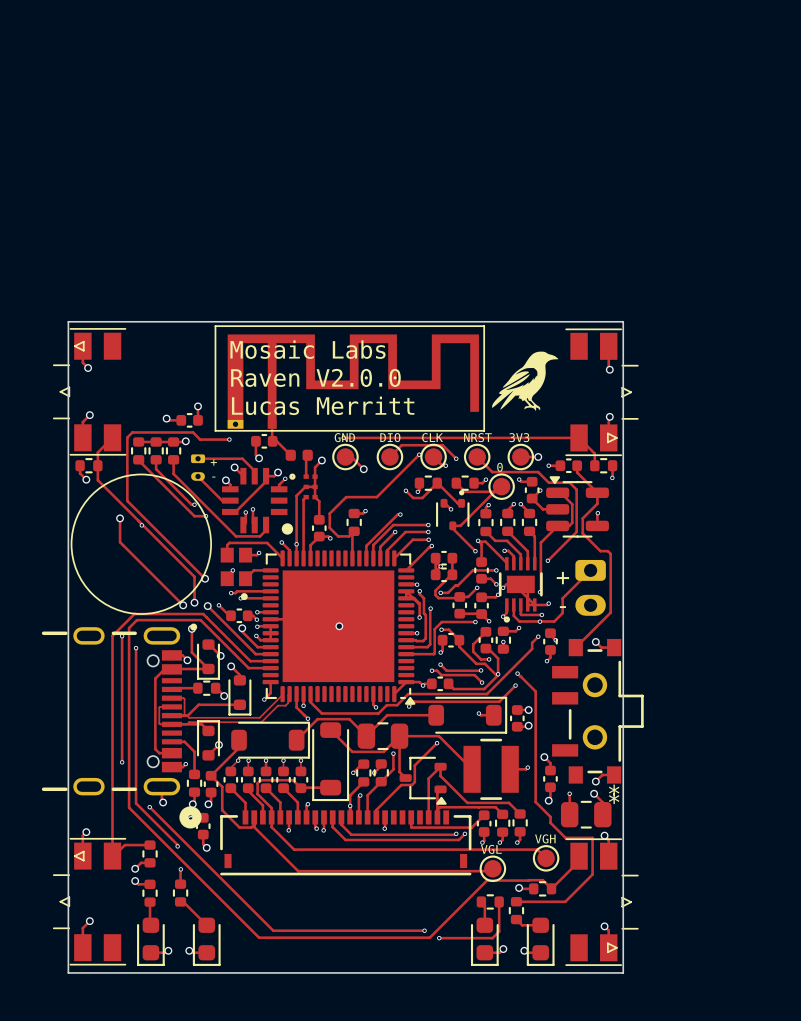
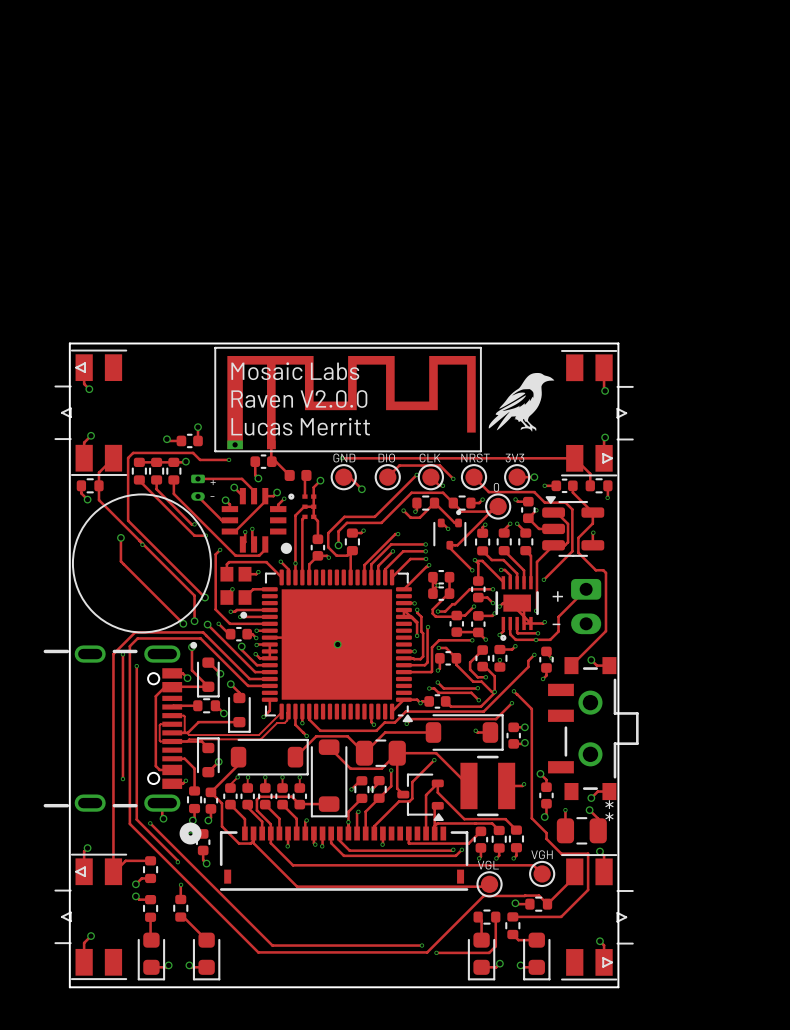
track: none -> (453, 503) (443, 492) (411, 492) (381, 522) (346, 522) (338, 531) (338, 545)
via: none -> (338, 545)
track: none -> (220, 549) (215, 554) (215, 609) (229, 623) (269, 623)
via: none -> (220, 549)

